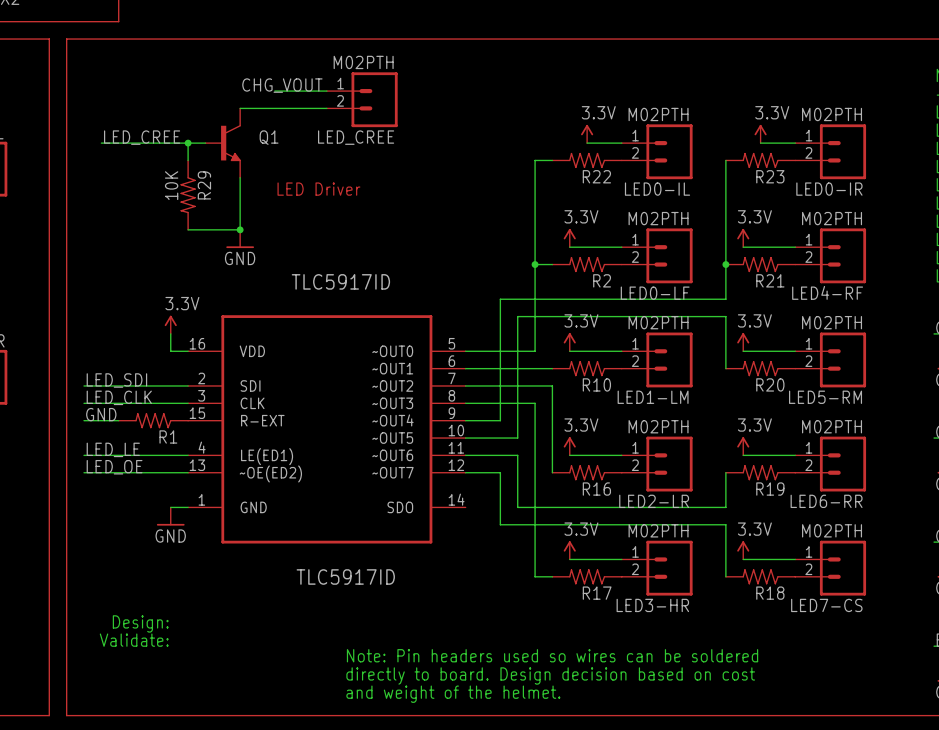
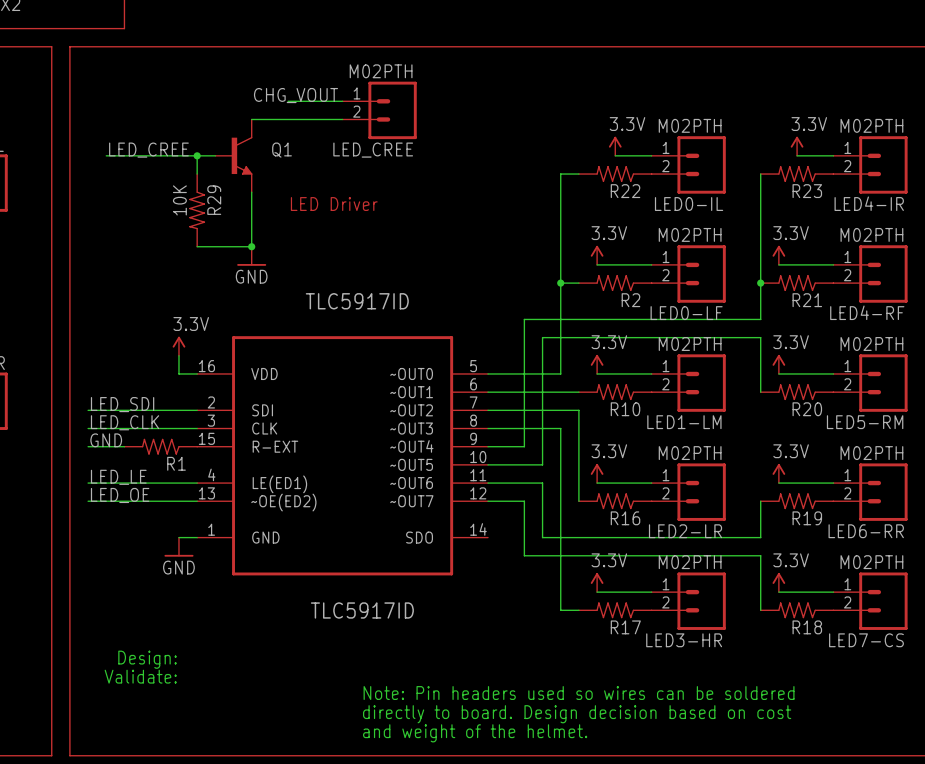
LED0-IR name: LED0-IR (829, 189) -> LED4-IR (869, 203)

